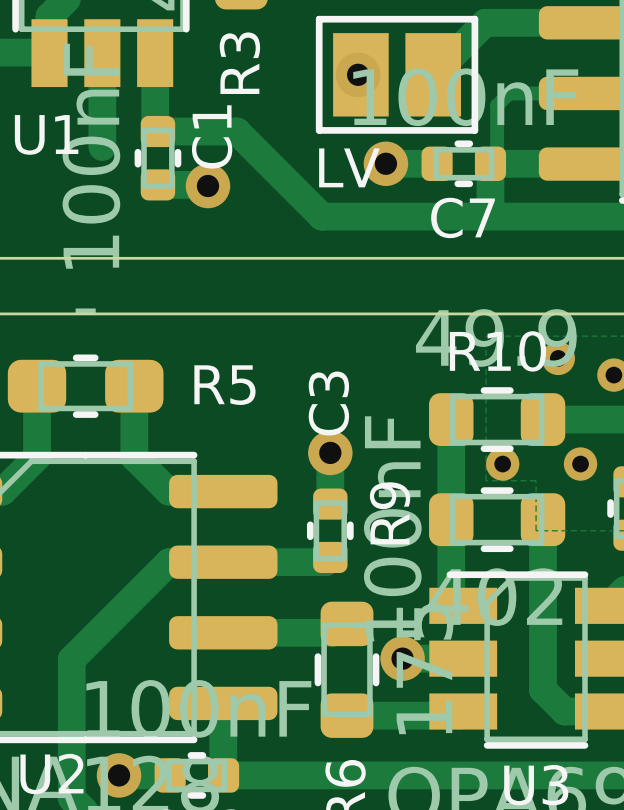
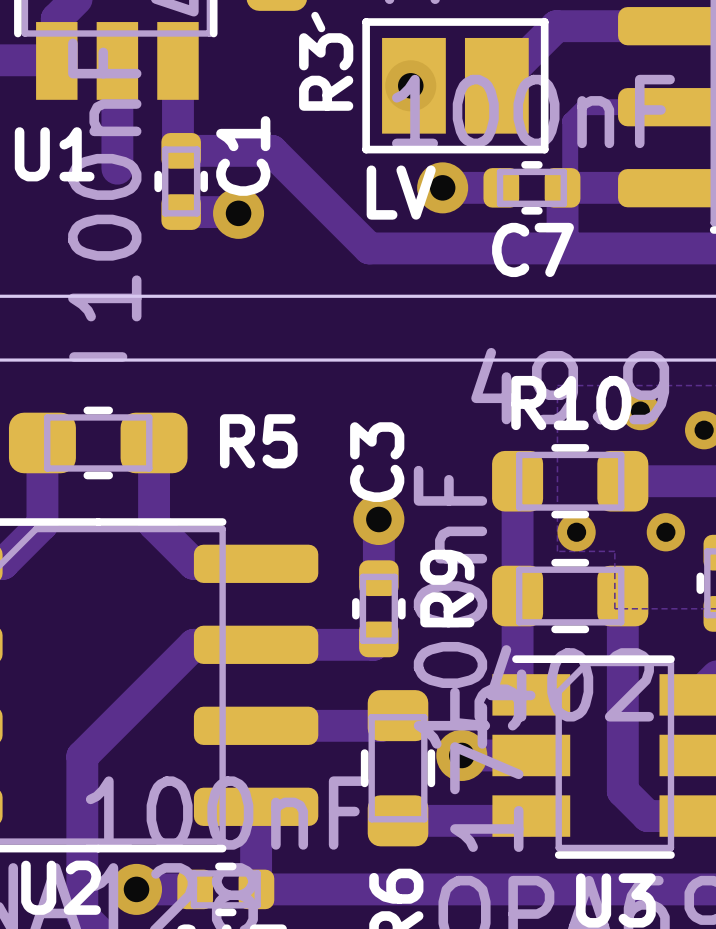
line: none -> (315, 15) (321, 28)
R3 name position: R3 (239, 63) -> R3 (326, 71)

